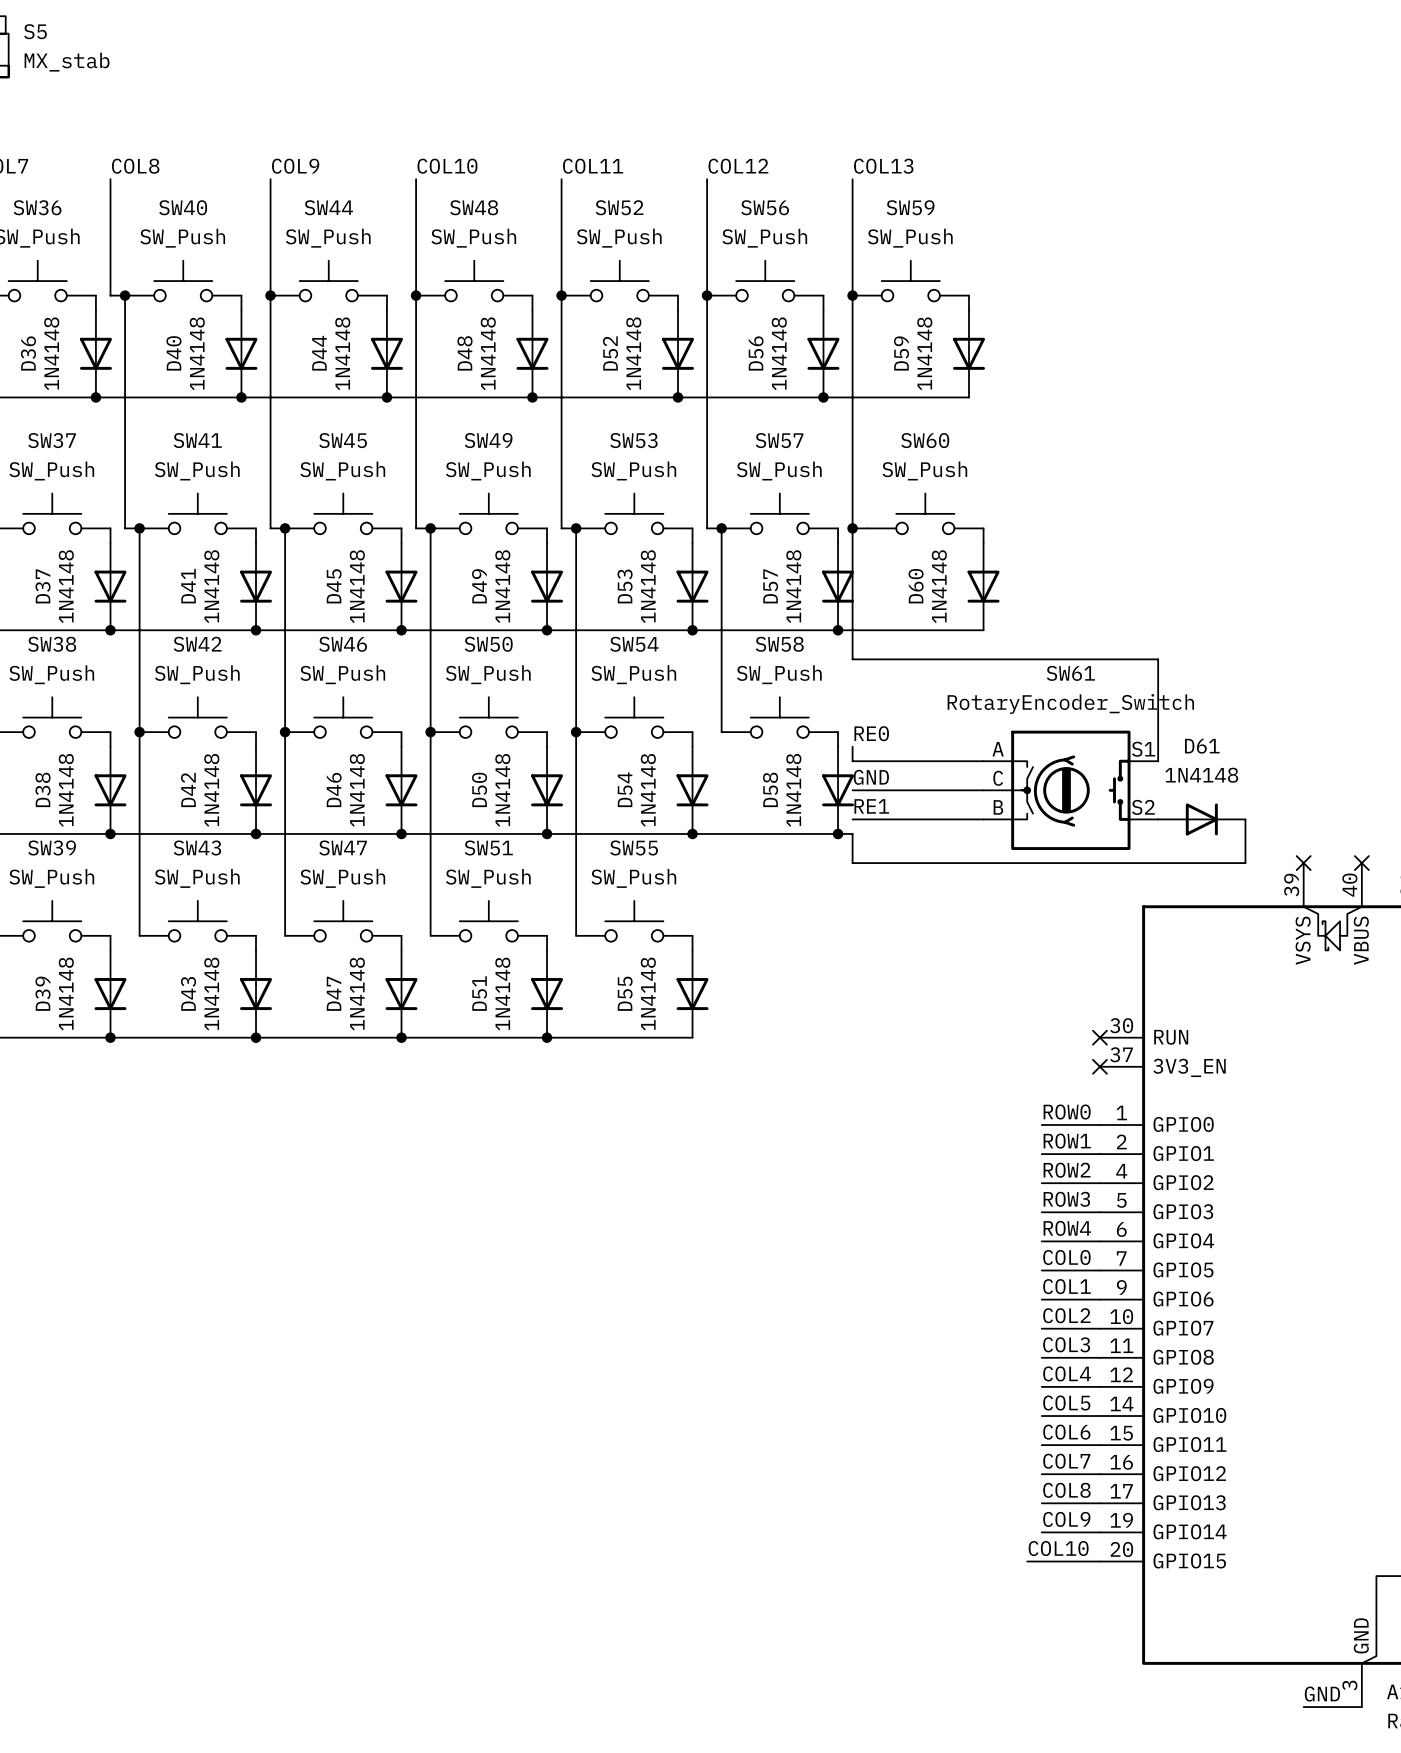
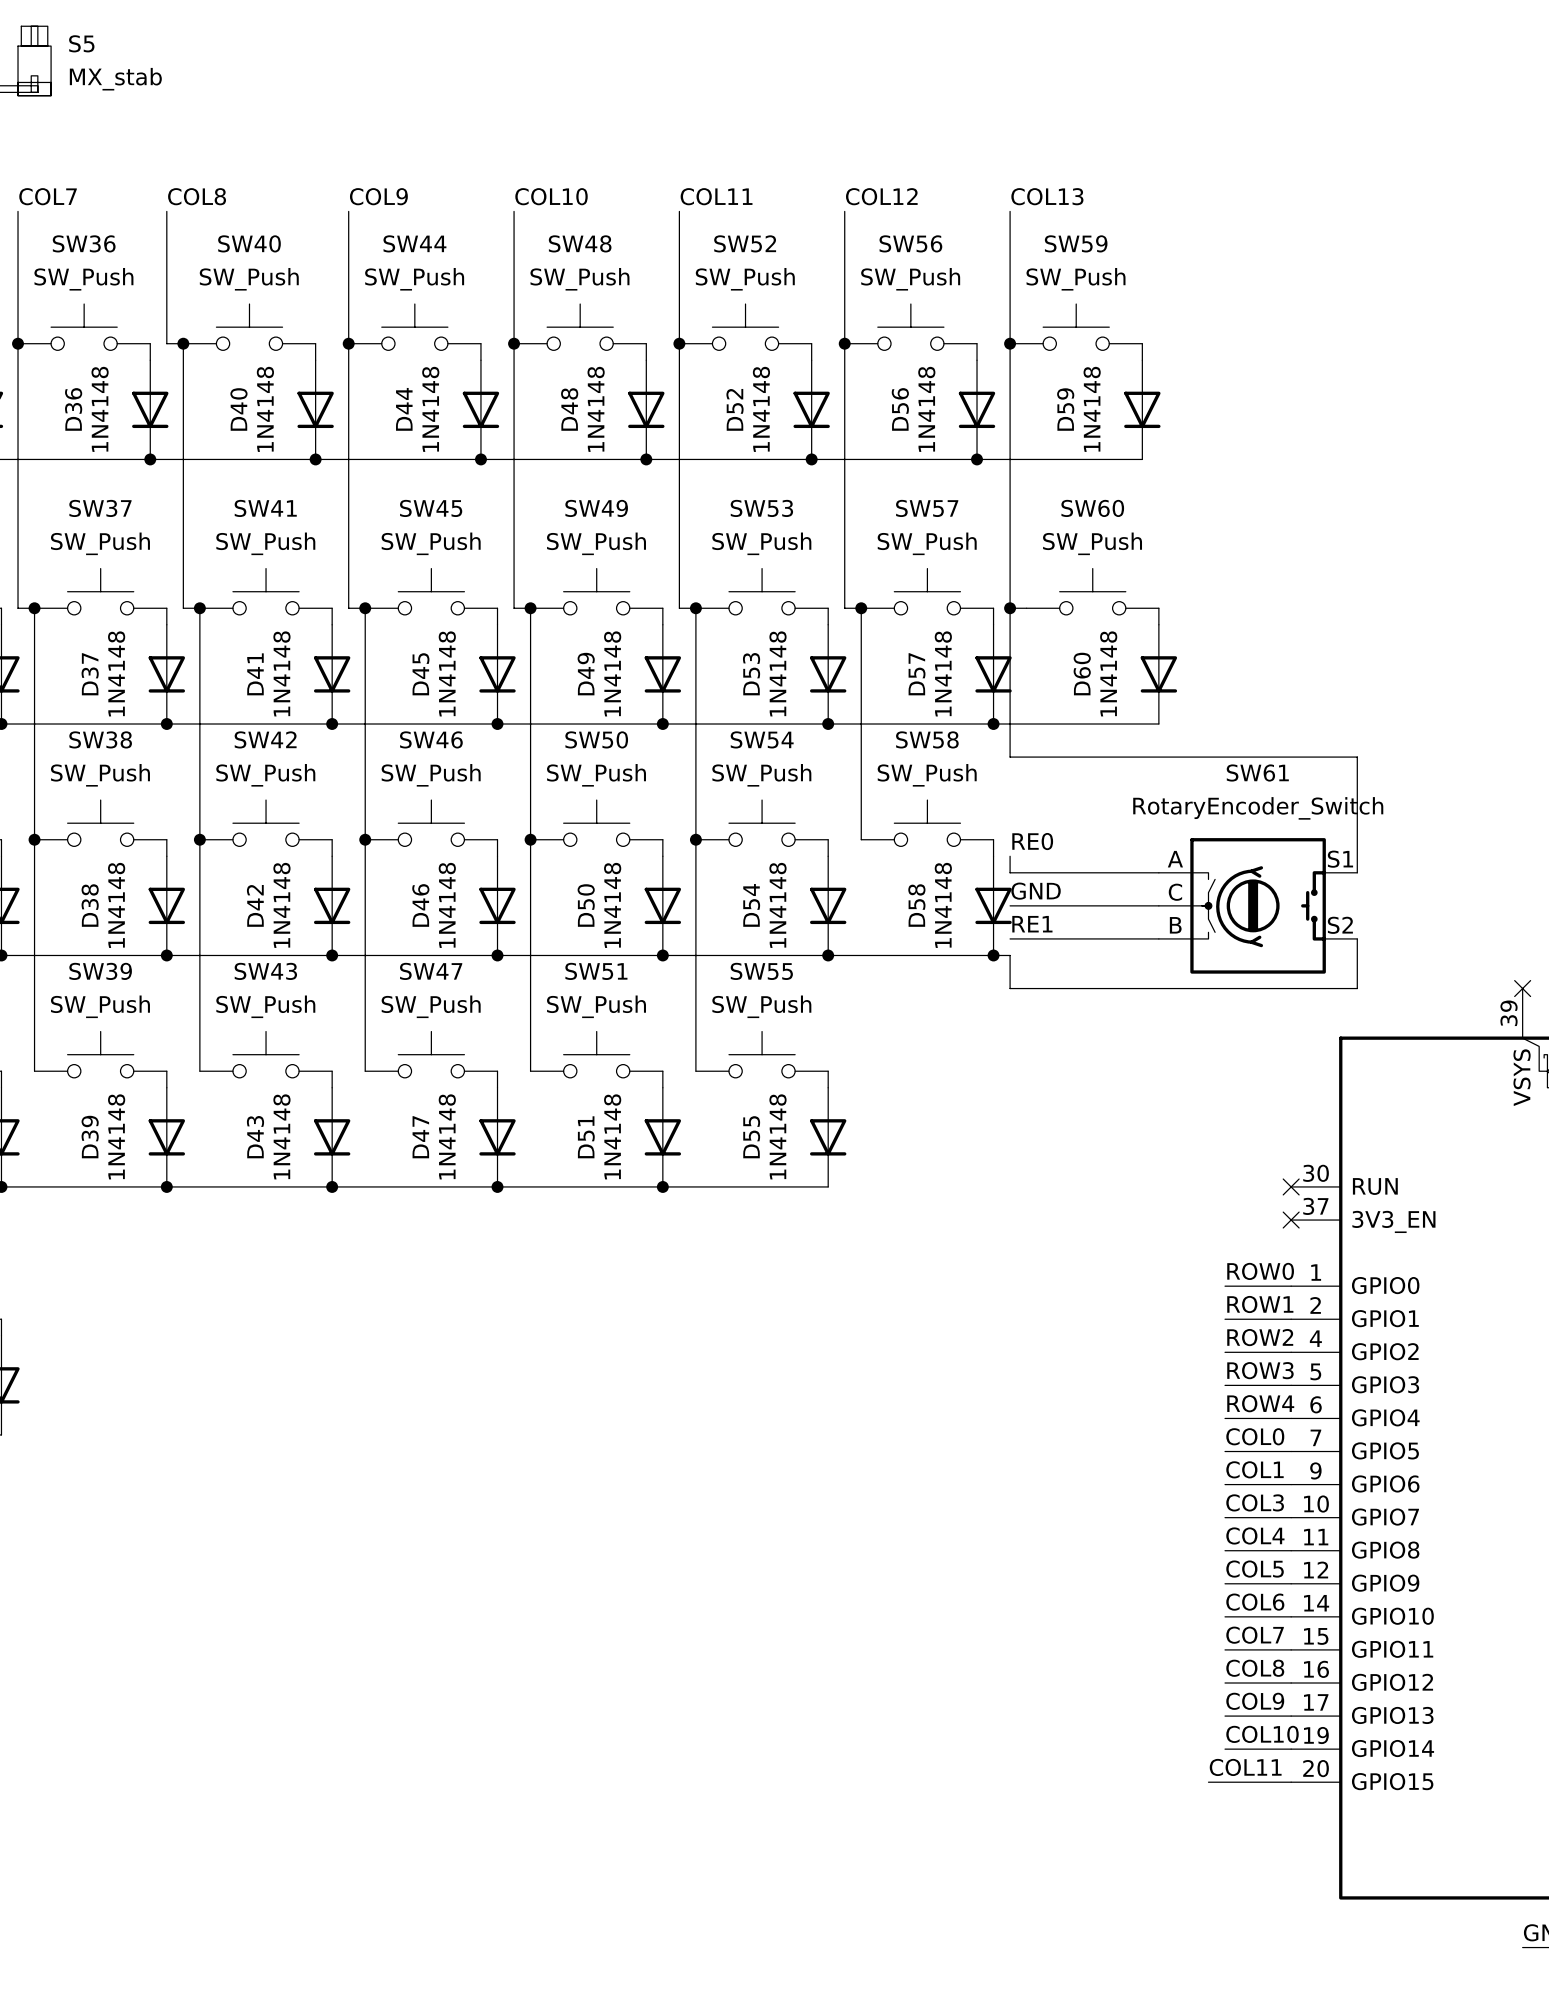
D61: 1N4148 (1201, 819) -> none
wire: (1245, 819) (1245, 863) (1158, 863) -> (1357, 938) (1357, 988)
label: COL2 (1066, 1315) -> COL3 (1255, 1502)
label: COL3 (1066, 1344) -> COL4 (1255, 1535)
label: COL4 (1067, 1373) -> COL5 (1255, 1569)
label: COL5 (1066, 1403) -> COL6 (1255, 1602)
label: COL6 (1066, 1432) -> COL7 (1255, 1635)
label: COL7 (1066, 1461) -> COL8 (1255, 1668)
label: COL8 (1066, 1490) -> COL9 (1255, 1701)
label: COL9 (1066, 1519) -> COL10 (1262, 1734)
label: COL10 (1058, 1548) -> COL11 (1245, 1767)

